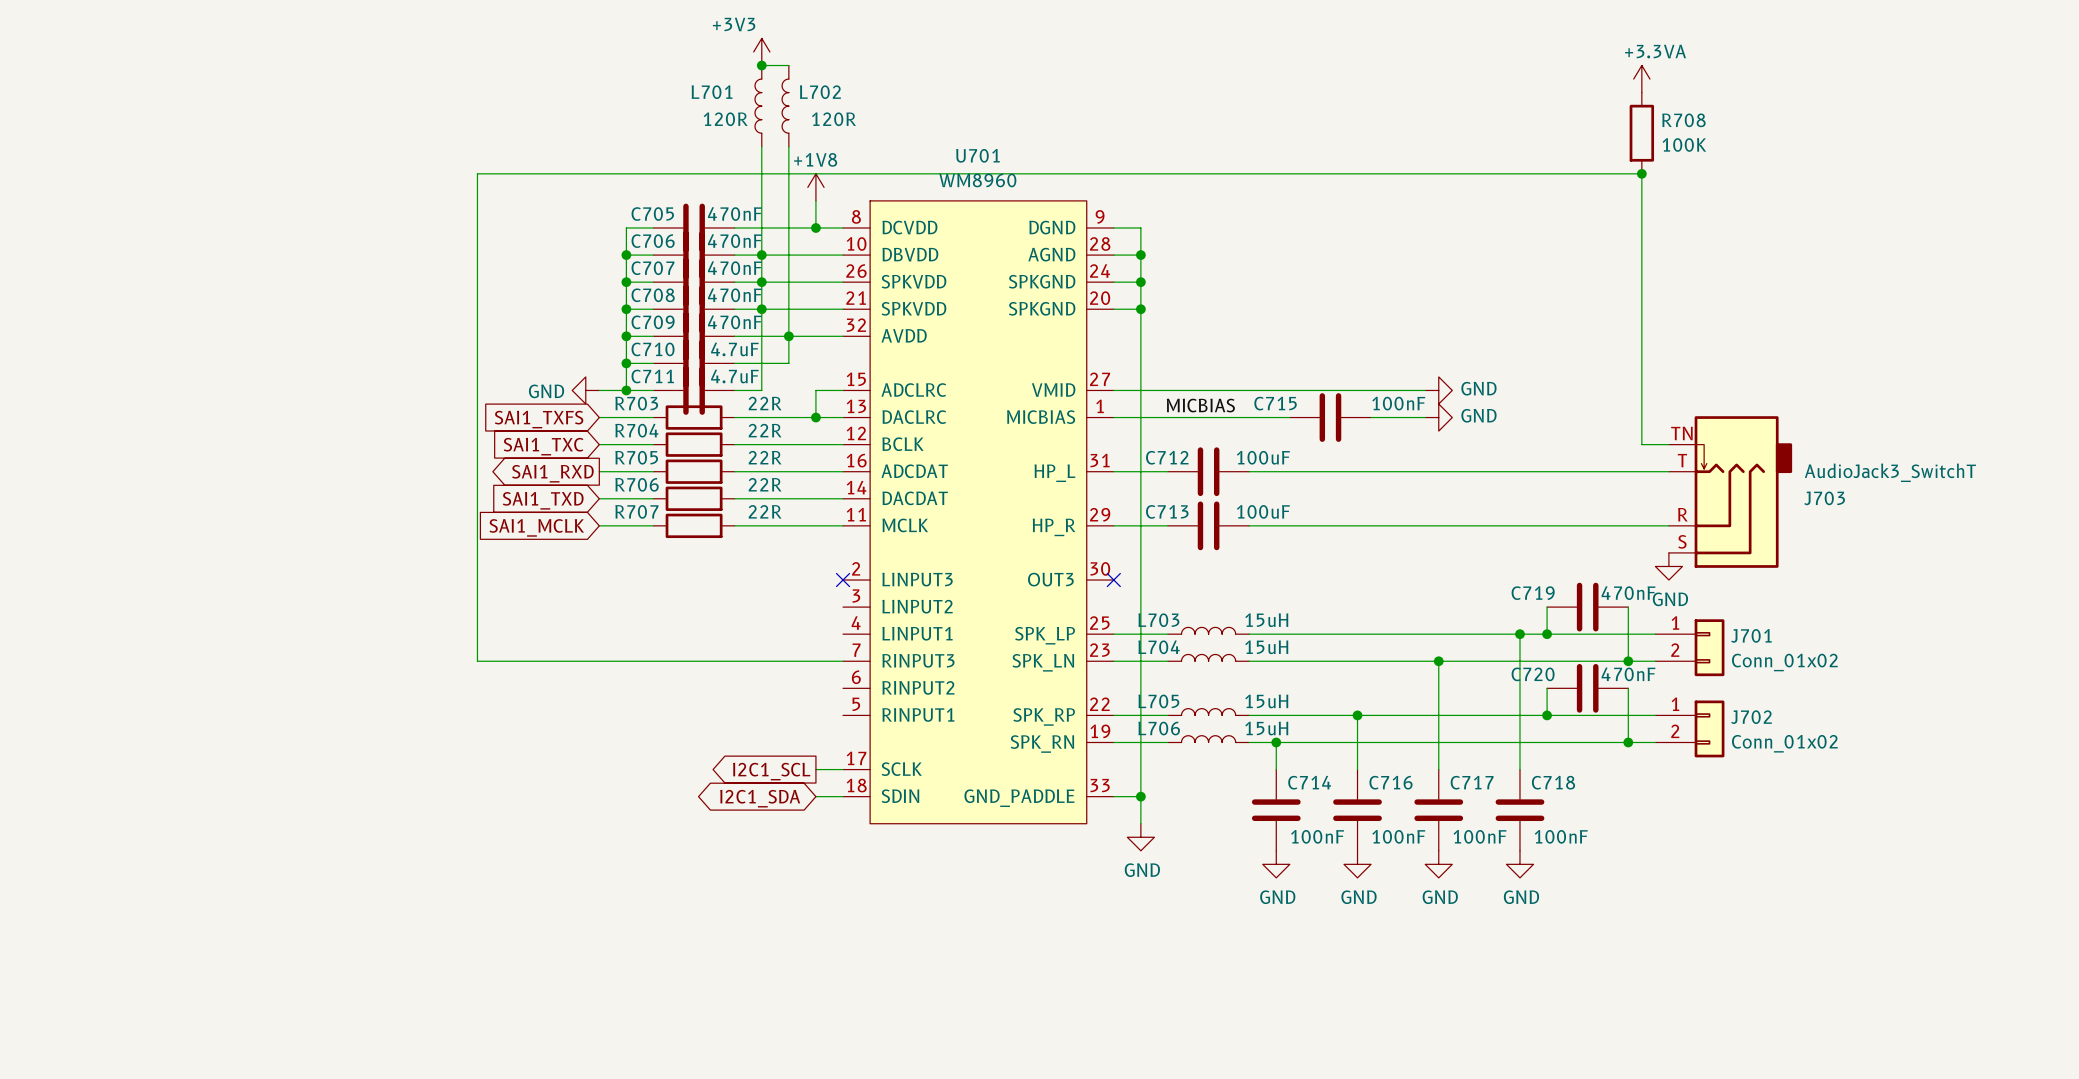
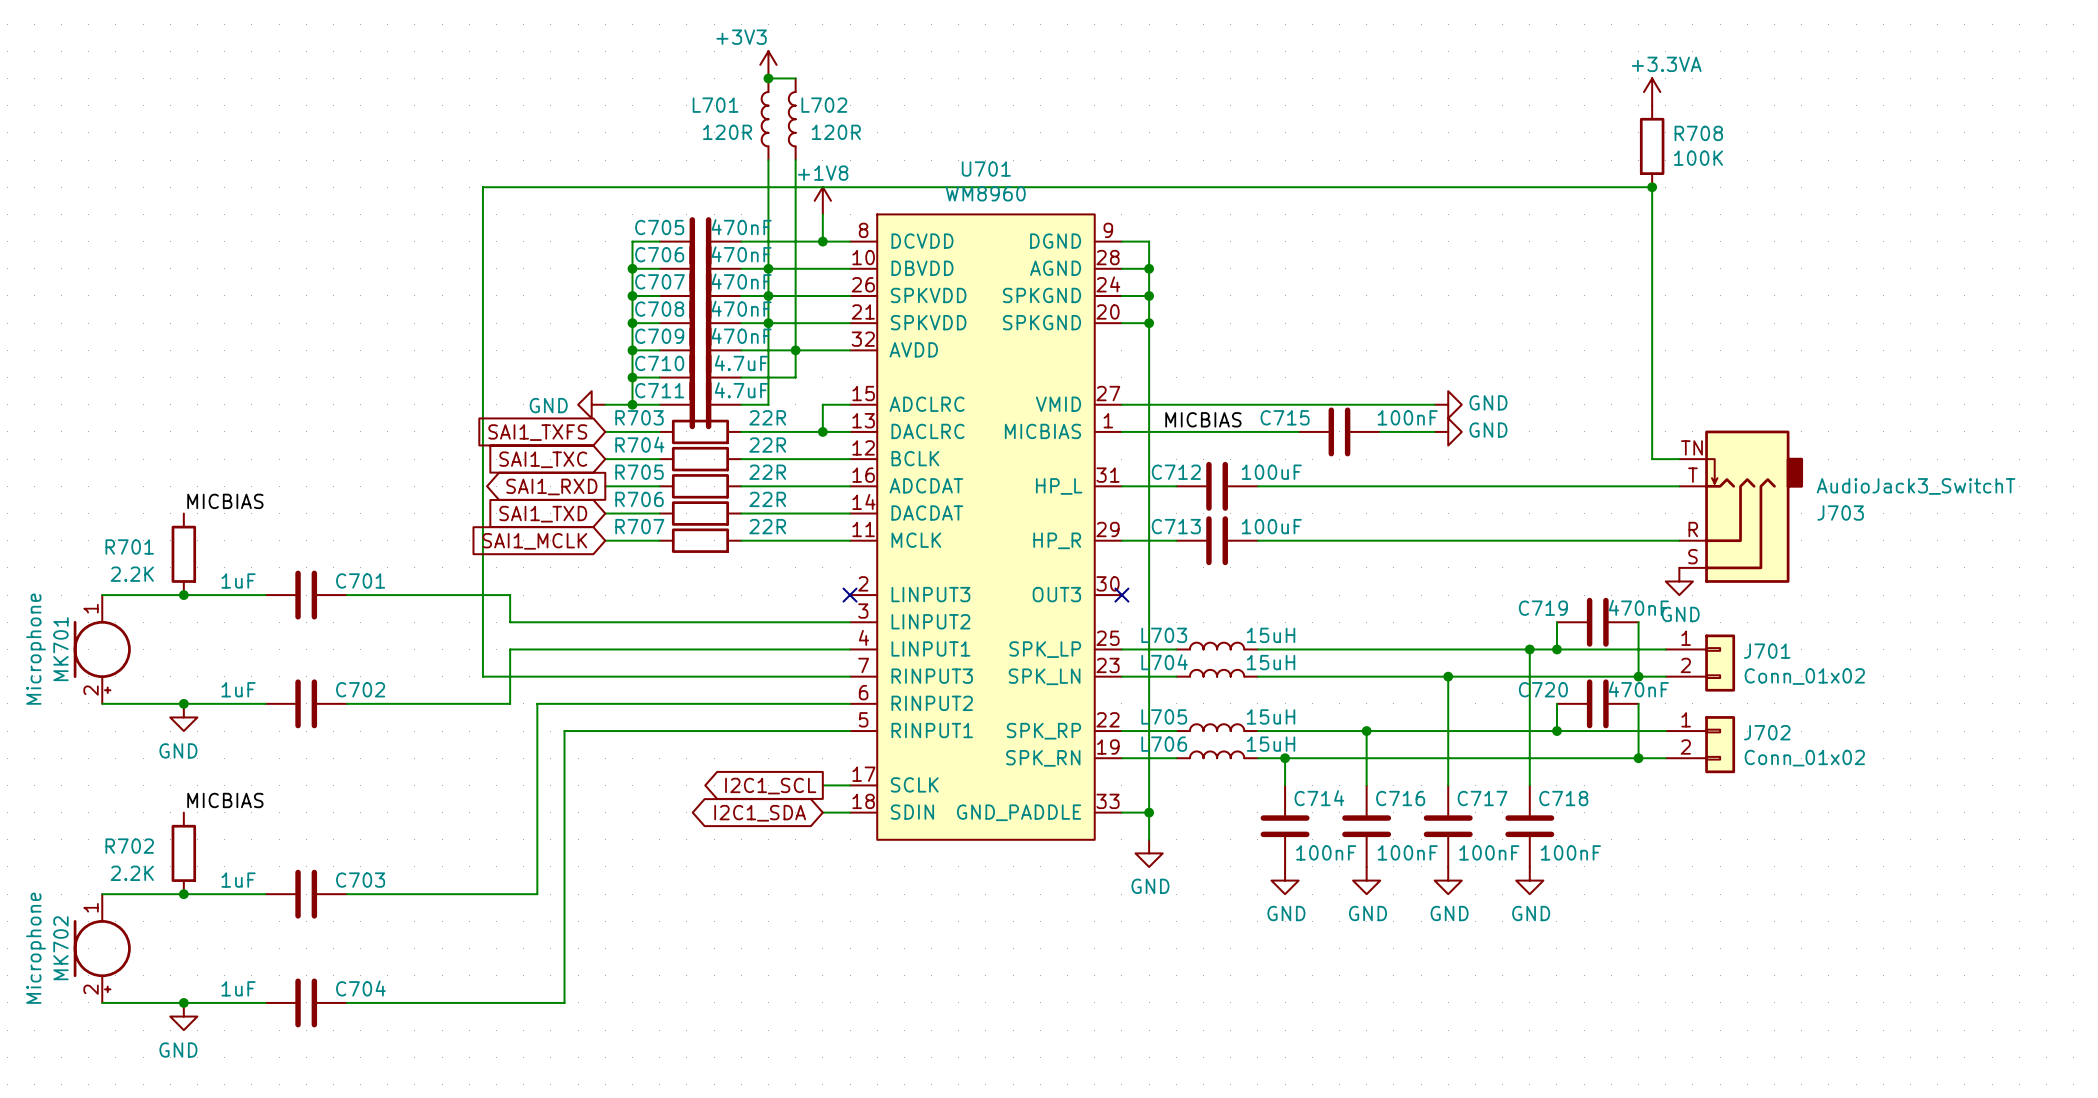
label: none -> MICBIAS (225, 501)
R701: none -> 2.2K (183, 554)
wire: none -> (102, 595) (265, 595)
junction: none -> (183, 595)
C701: none -> 1uF (306, 595)
wire: none -> (346, 595) (510, 595) (510, 622) (850, 622)
MK701: none -> Microphone (102, 649)
wire: none -> (850, 649) (510, 649) (510, 703) (346, 703)
wire: none -> (102, 703) (265, 703)
junction: none -> (183, 703)
C702: none -> 1uF (306, 703)
wire: none -> (850, 703) (537, 703) (537, 894) (346, 894)
power symbol: none -> GND (183, 717)
wire: none -> (850, 731) (564, 731) (564, 1002) (346, 1002)
label: none -> MICBIAS (225, 800)
R702: none -> 2.2K (183, 853)
wire: none -> (102, 894) (265, 894)
junction: none -> (183, 894)
C703: none -> 1uF (306, 894)
MK702: none -> Microphone (102, 948)
wire: none -> (102, 1002) (265, 1002)
junction: none -> (183, 1002)
C704: none -> 1uF (306, 1002)
power symbol: none -> GND (183, 1016)

